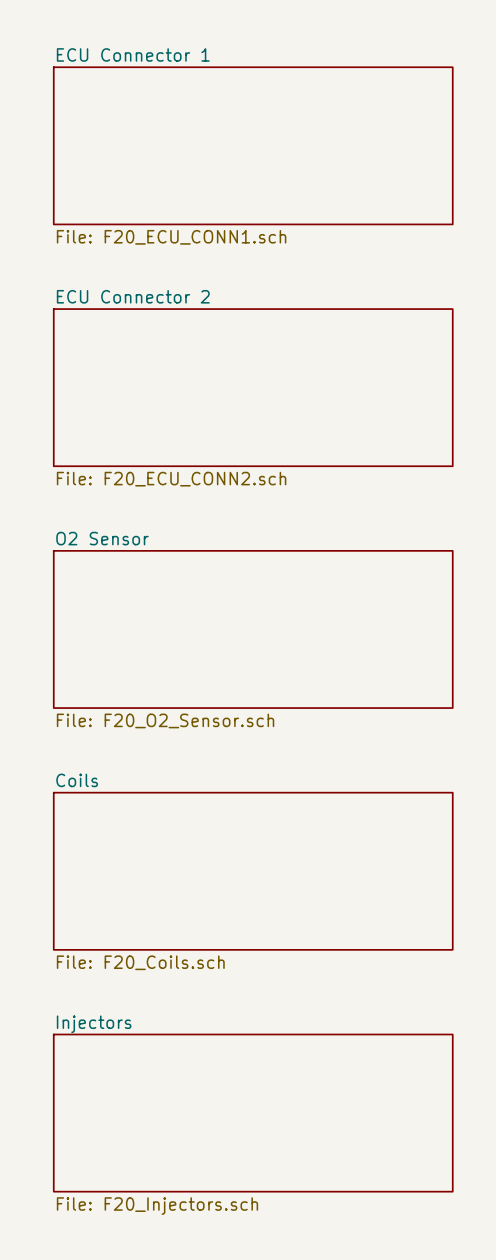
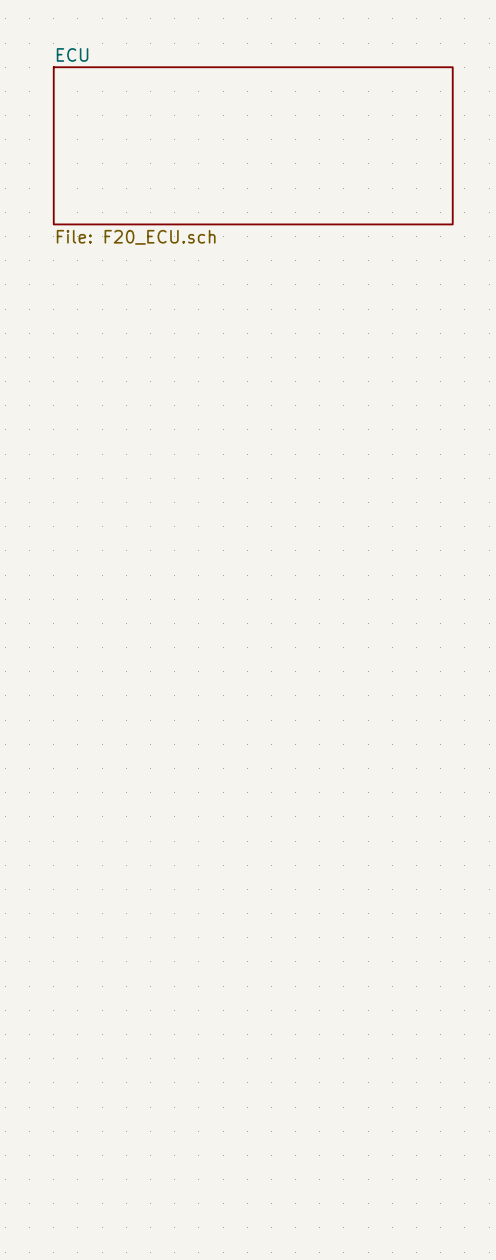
sheet ECU Connector 1 name: ECU Connector 1 (133, 54) -> ECU (72, 54)
sheet ECU Connector 1 value: File: F20_ECU_CONN1.sch (171, 237) -> File: F20_ECU.sch (136, 237)
sheet ECU Connector 2: File: F20_ECU_CONN2.sch (253, 387) -> none
sheet O2 Sensor: File: F20_O2_Sensor.sch (253, 629) -> none
sheet Coils: File: F20_Coils.sch (253, 871) -> none
sheet Injectors: File: F20_Injectors.sch (253, 1113) -> none

